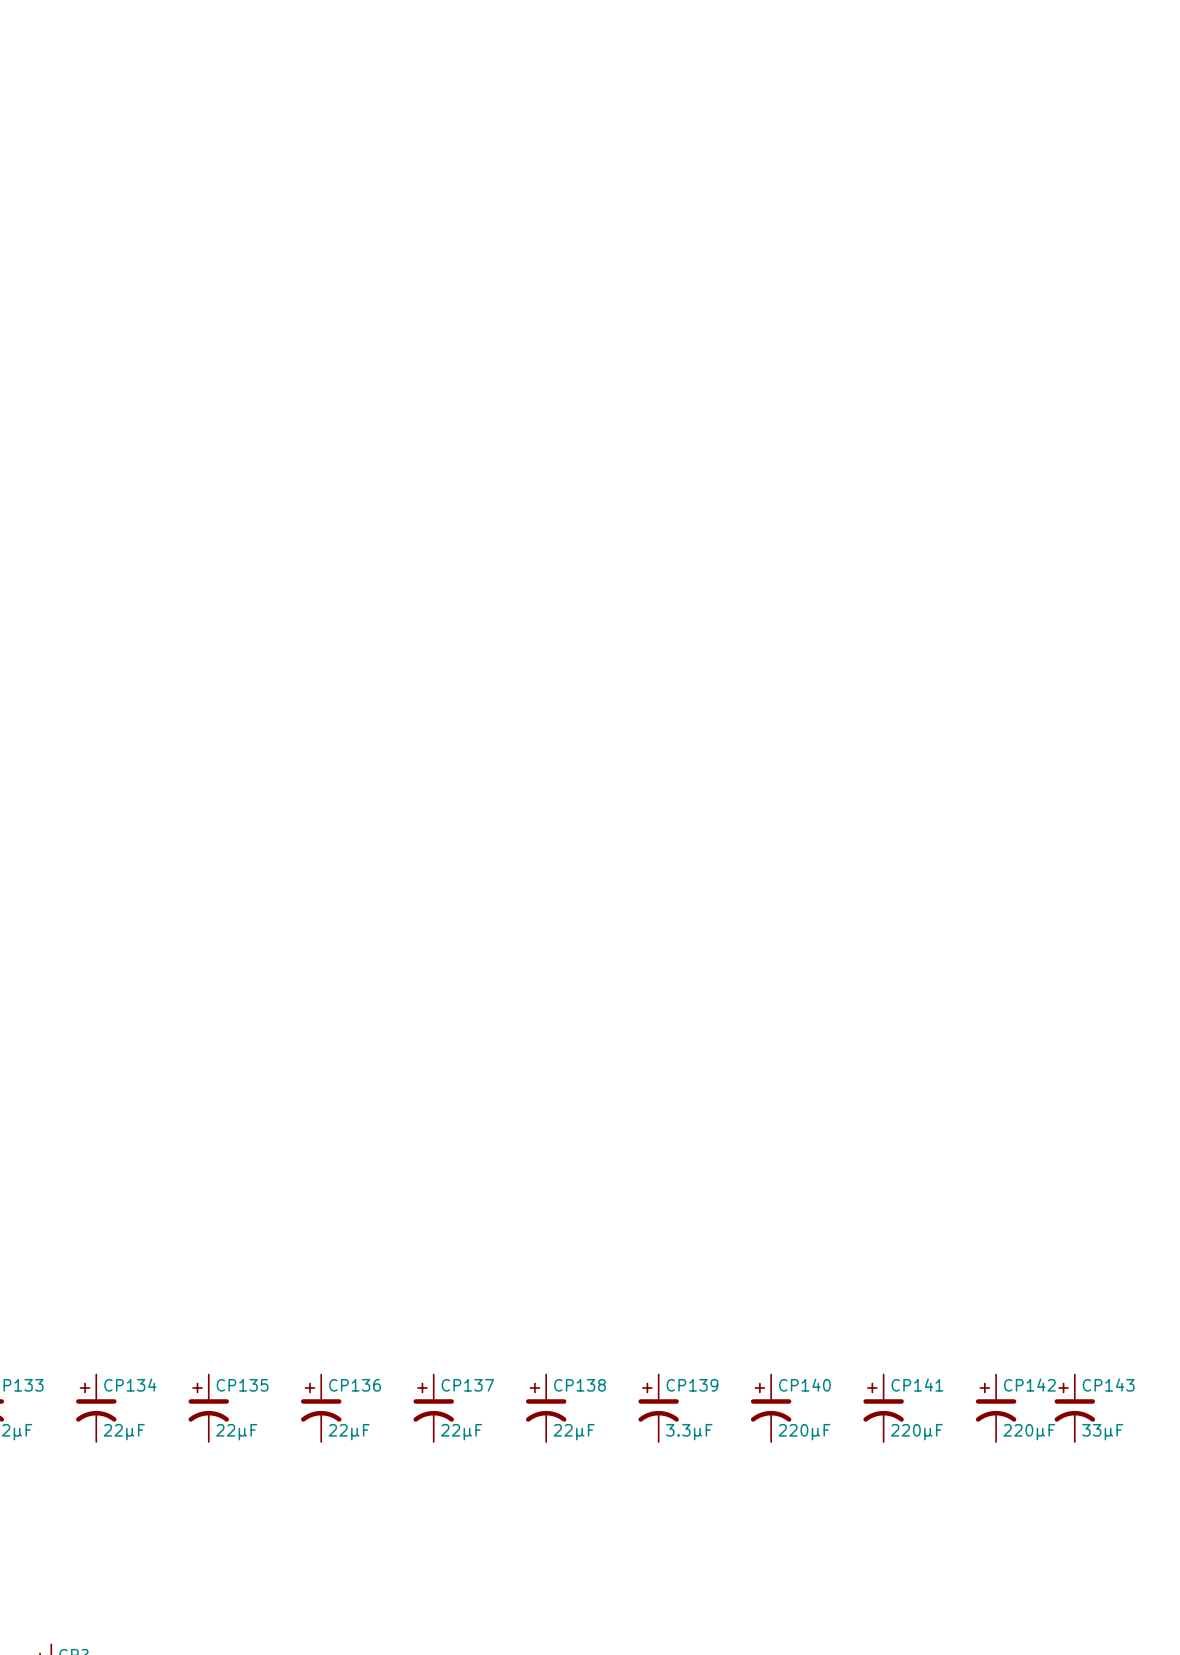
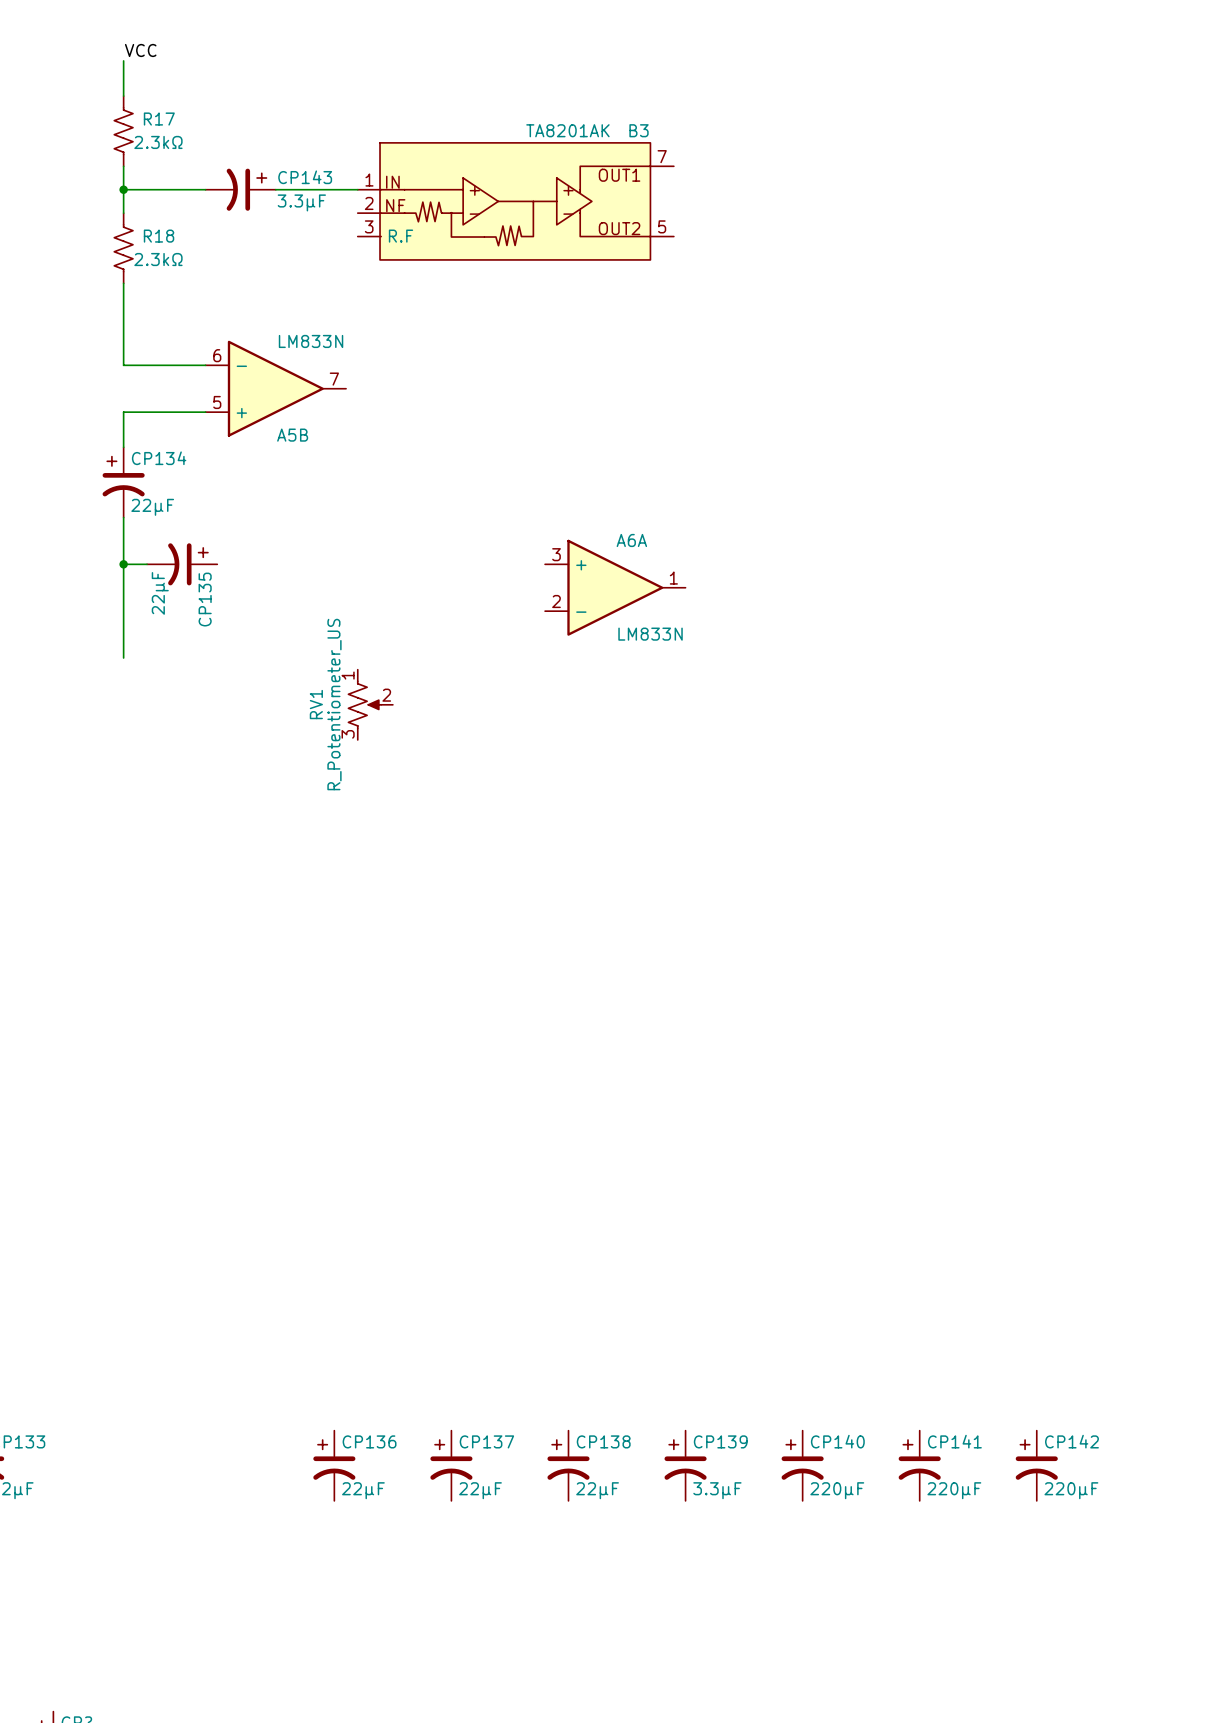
label: none -> VCC (140, 50)
wire: none -> (123, 60) (123, 96)
R17: none -> 2.3kΩ (123, 131)
wire: none -> (123, 166) (123, 213)
wire: none -> (123, 189) (205, 189)
junction: none -> (123, 189)
wire: none -> (275, 189) (357, 189)
B3: none -> TA8201AK (515, 201)
R18: none -> 2.3kΩ (123, 248)
wire: none -> (123, 283) (123, 365) (205, 365)
A5B: none -> LM833N (275, 388)
wire: none -> (205, 412) (123, 412) (123, 447)
wire: none -> (123, 517) (123, 657)
wire: none -> (123, 564) (147, 564)
junction: none -> (123, 564)
A6A: none -> LM833N (615, 587)
RV1: none -> R_Potentiometer_US (370, 704)
CP143 name position: CP143 (1108, 1385) -> CP143 (305, 177)
CP135 rotation: 0° (208, 1402) -> 90° clockwise (188, 564)
CP143 rotation: 0° (1074, 1402) -> 90° clockwise (246, 189)
CP134 position: (96, 1408) -> (123, 482)
CP135 position: (208, 1408) -> (182, 564)
CP143 position: (1074, 1408) -> (240, 189)
CP143 value: 33μF (1102, 1432) -> 3.3μF (301, 202)

